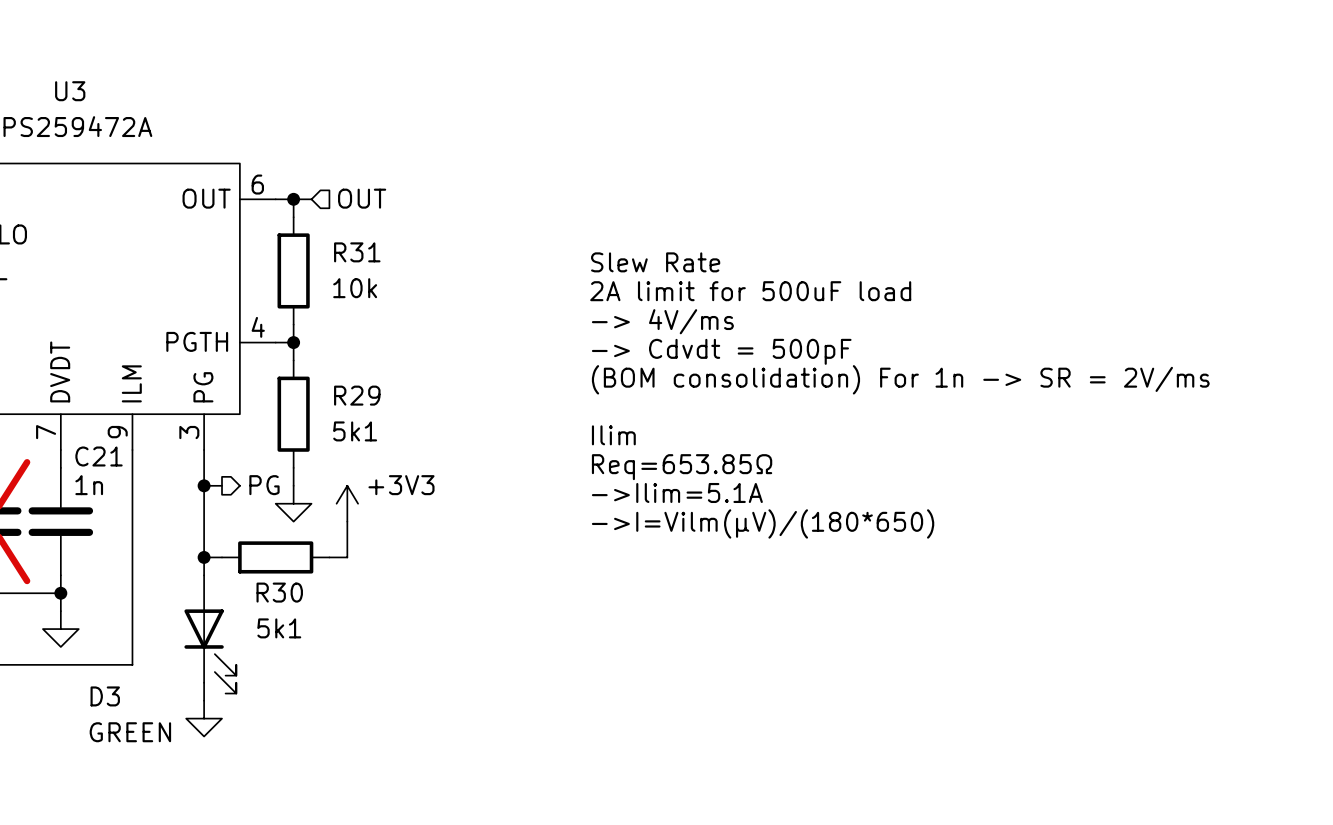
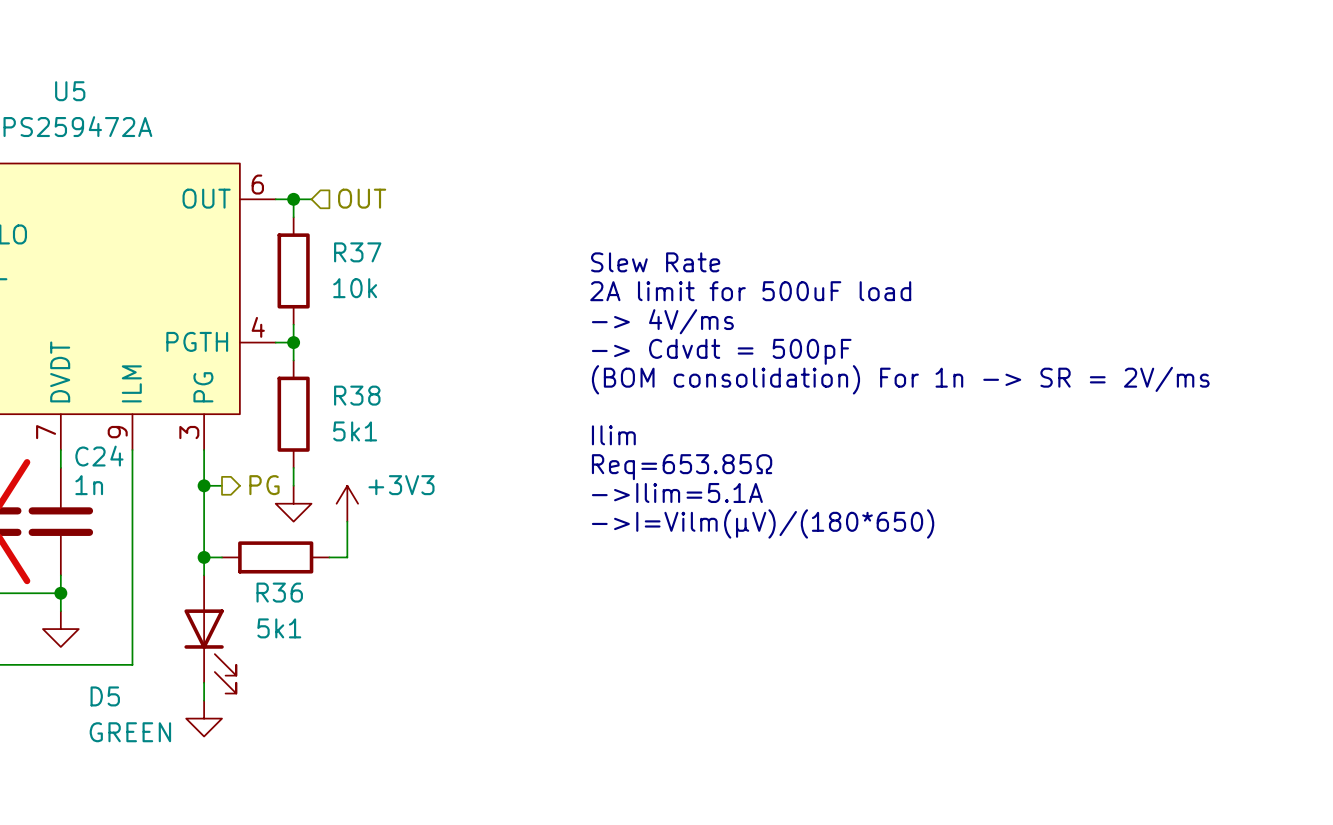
U3 name: U3 (70, 91) -> U5 (70, 91)
R31 name: R31 (357, 252) -> R37 (357, 252)
R29 name: R29 (357, 395) -> R38 (357, 395)
C21 name: C21 (99, 456) -> C24 (99, 456)
R30 name: R30 (279, 592) -> R36 (279, 592)
D3 name: D3 (105, 696) -> D5 (105, 696)

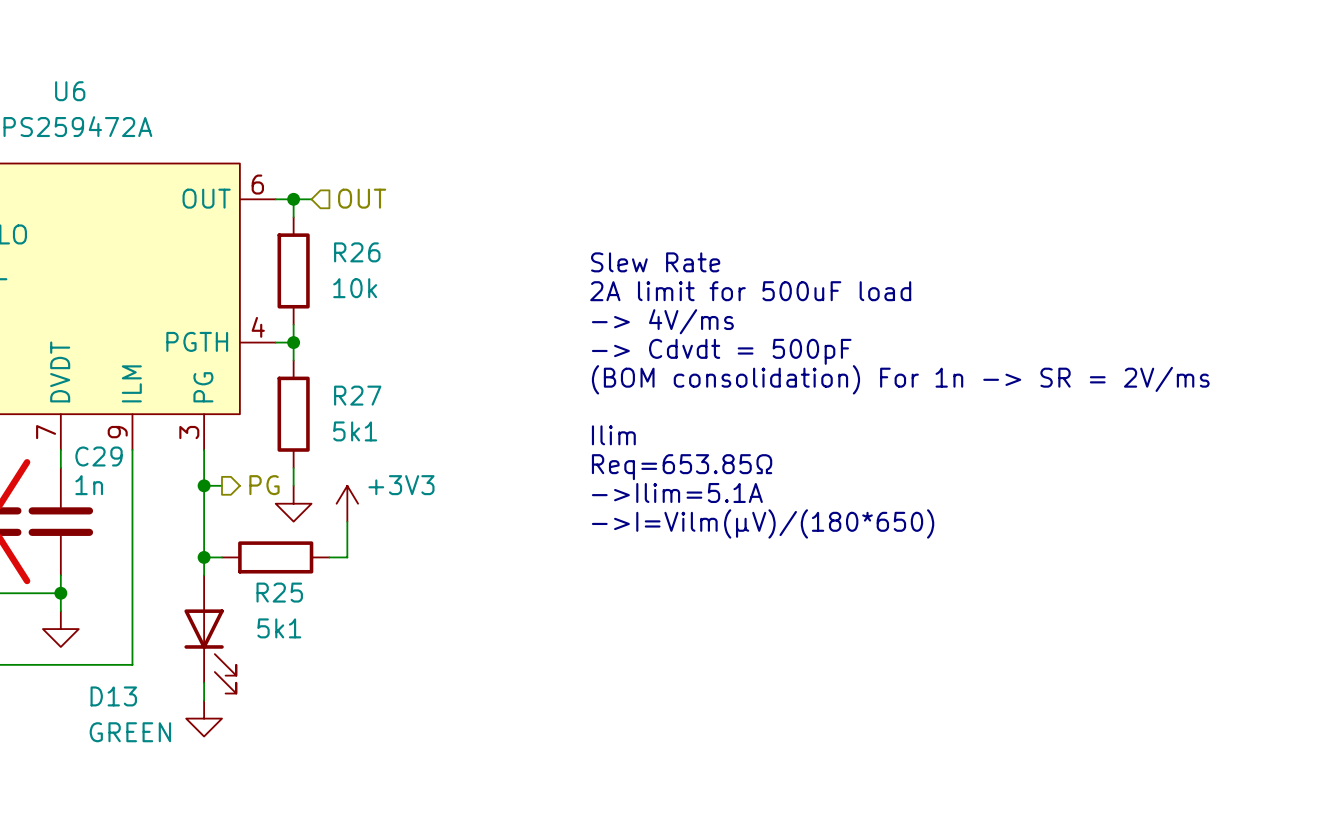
U5 name: U5 (70, 91) -> U6 (70, 91)
R37 name: R37 (357, 252) -> R26 (357, 252)
R38 name: R38 (357, 395) -> R27 (357, 395)
C24 name: C24 (99, 456) -> C29 (99, 456)
R36 name: R36 (279, 592) -> R25 (279, 592)
D5 name: D5 (105, 696) -> D13 (113, 696)

